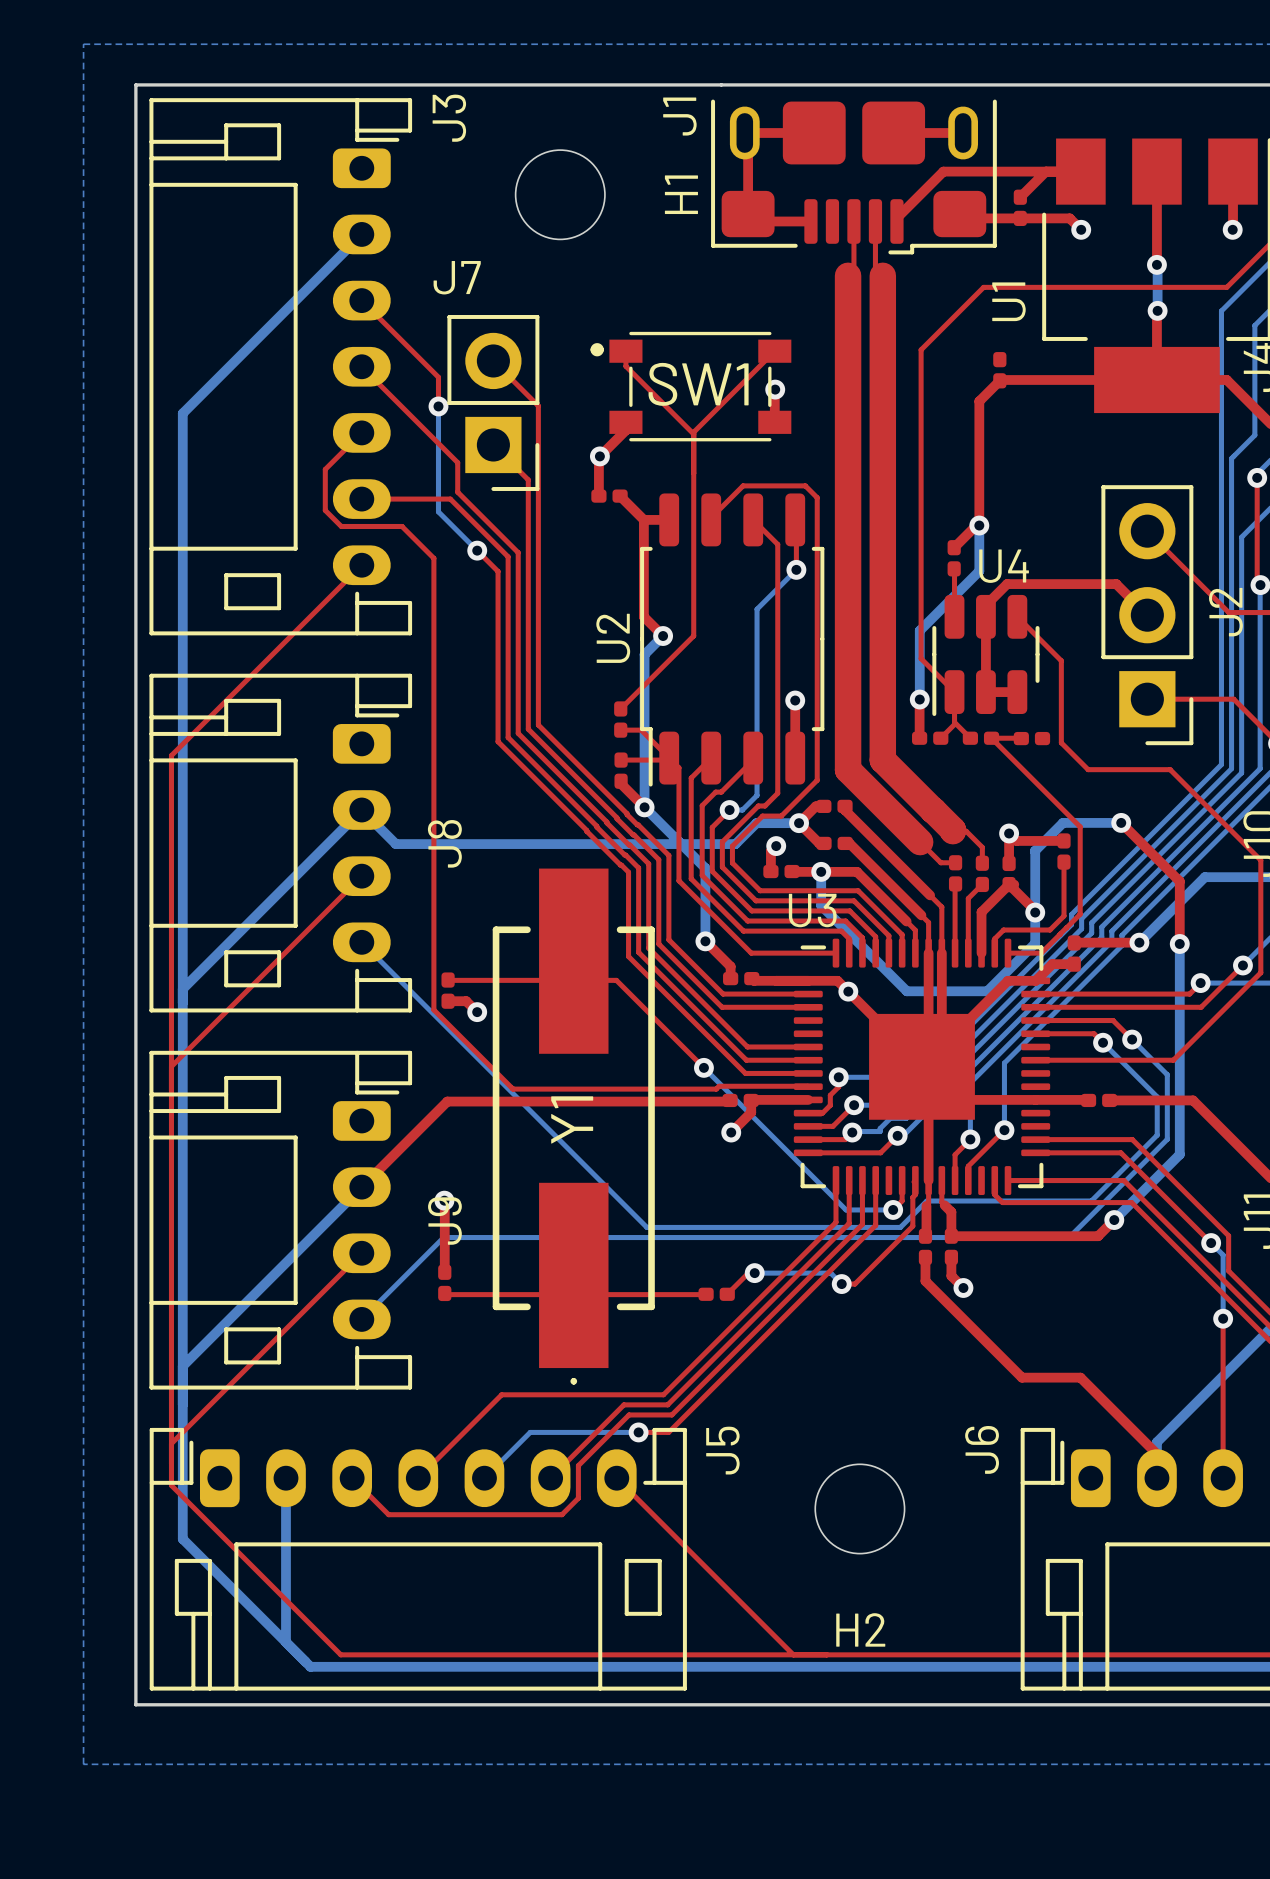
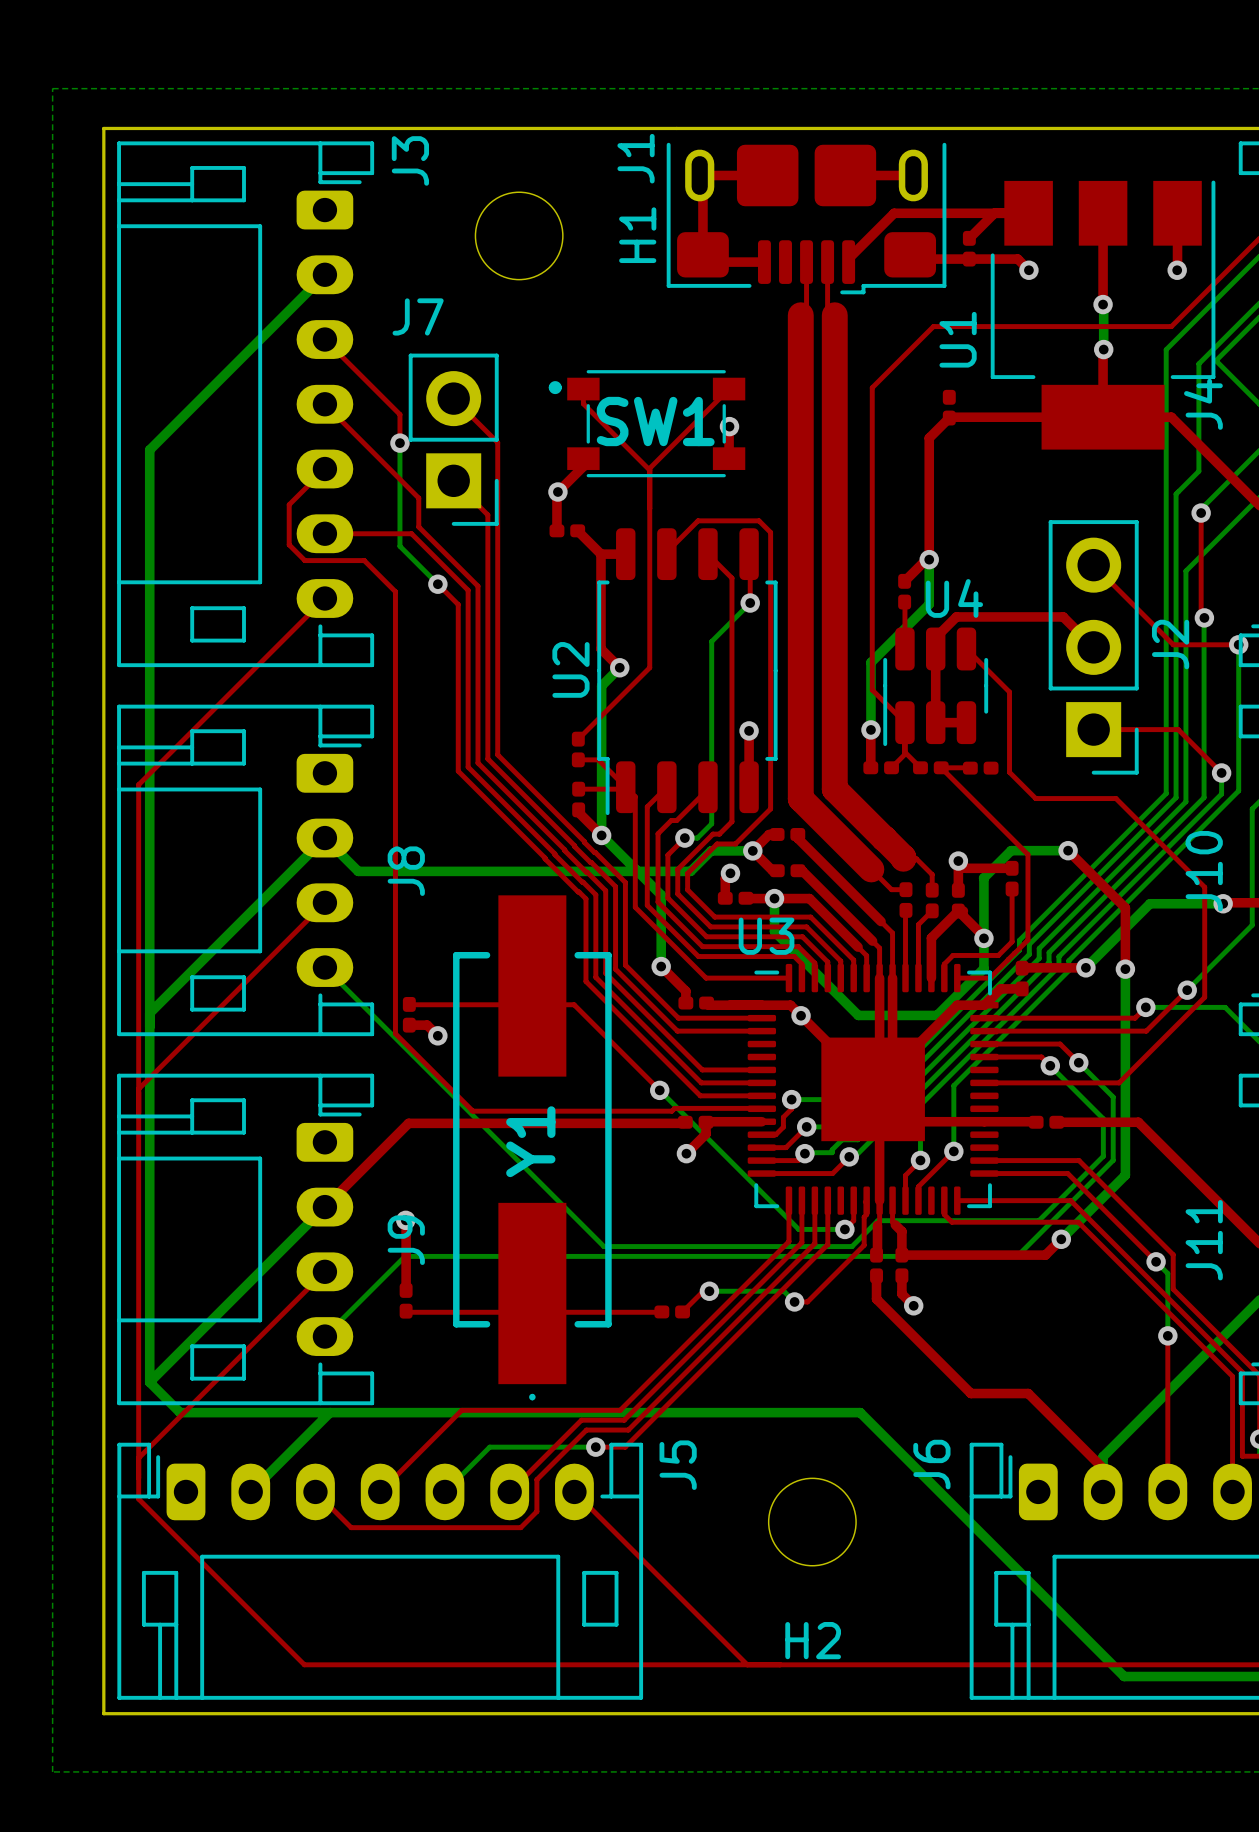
bottom track: (182, 1366) (182, 1539) (310, 1666) (1178, 1666) -> (149, 1382) (180, 1412) (860, 1412) (1124, 1676)
bottom track: (285, 1478) (285, 1642) -> (250, 1491) (330, 1412)

